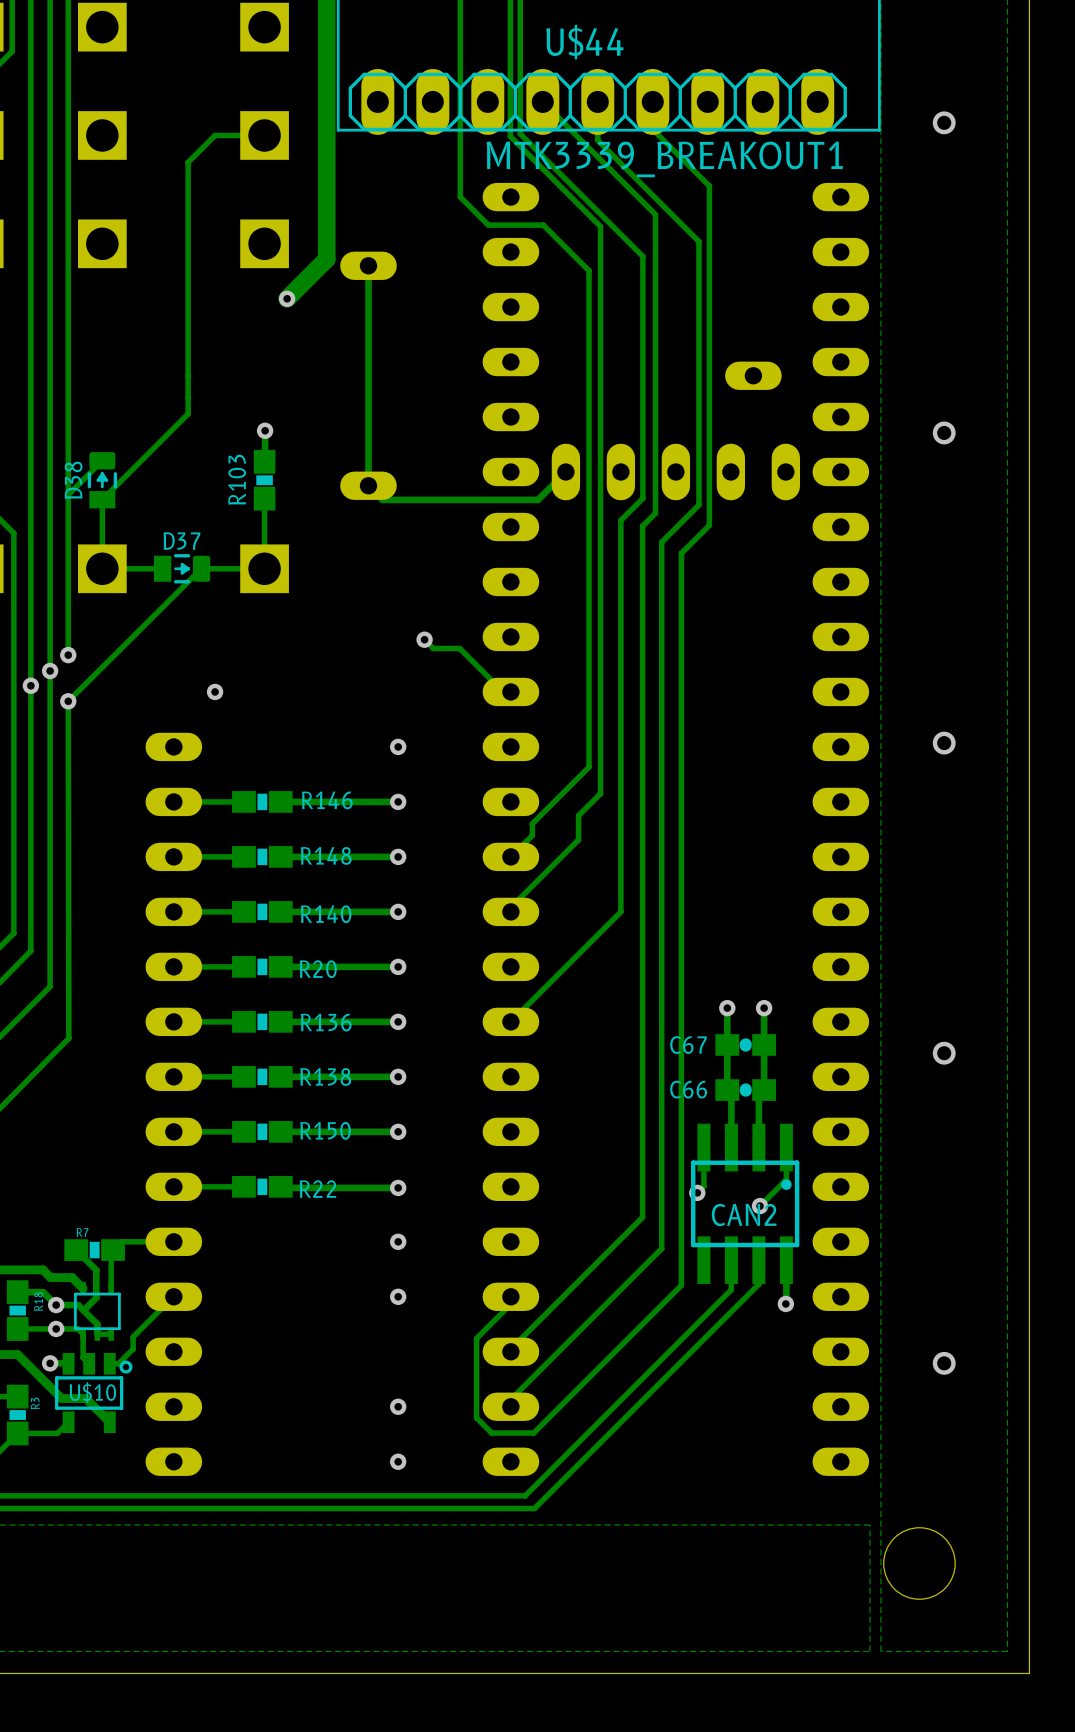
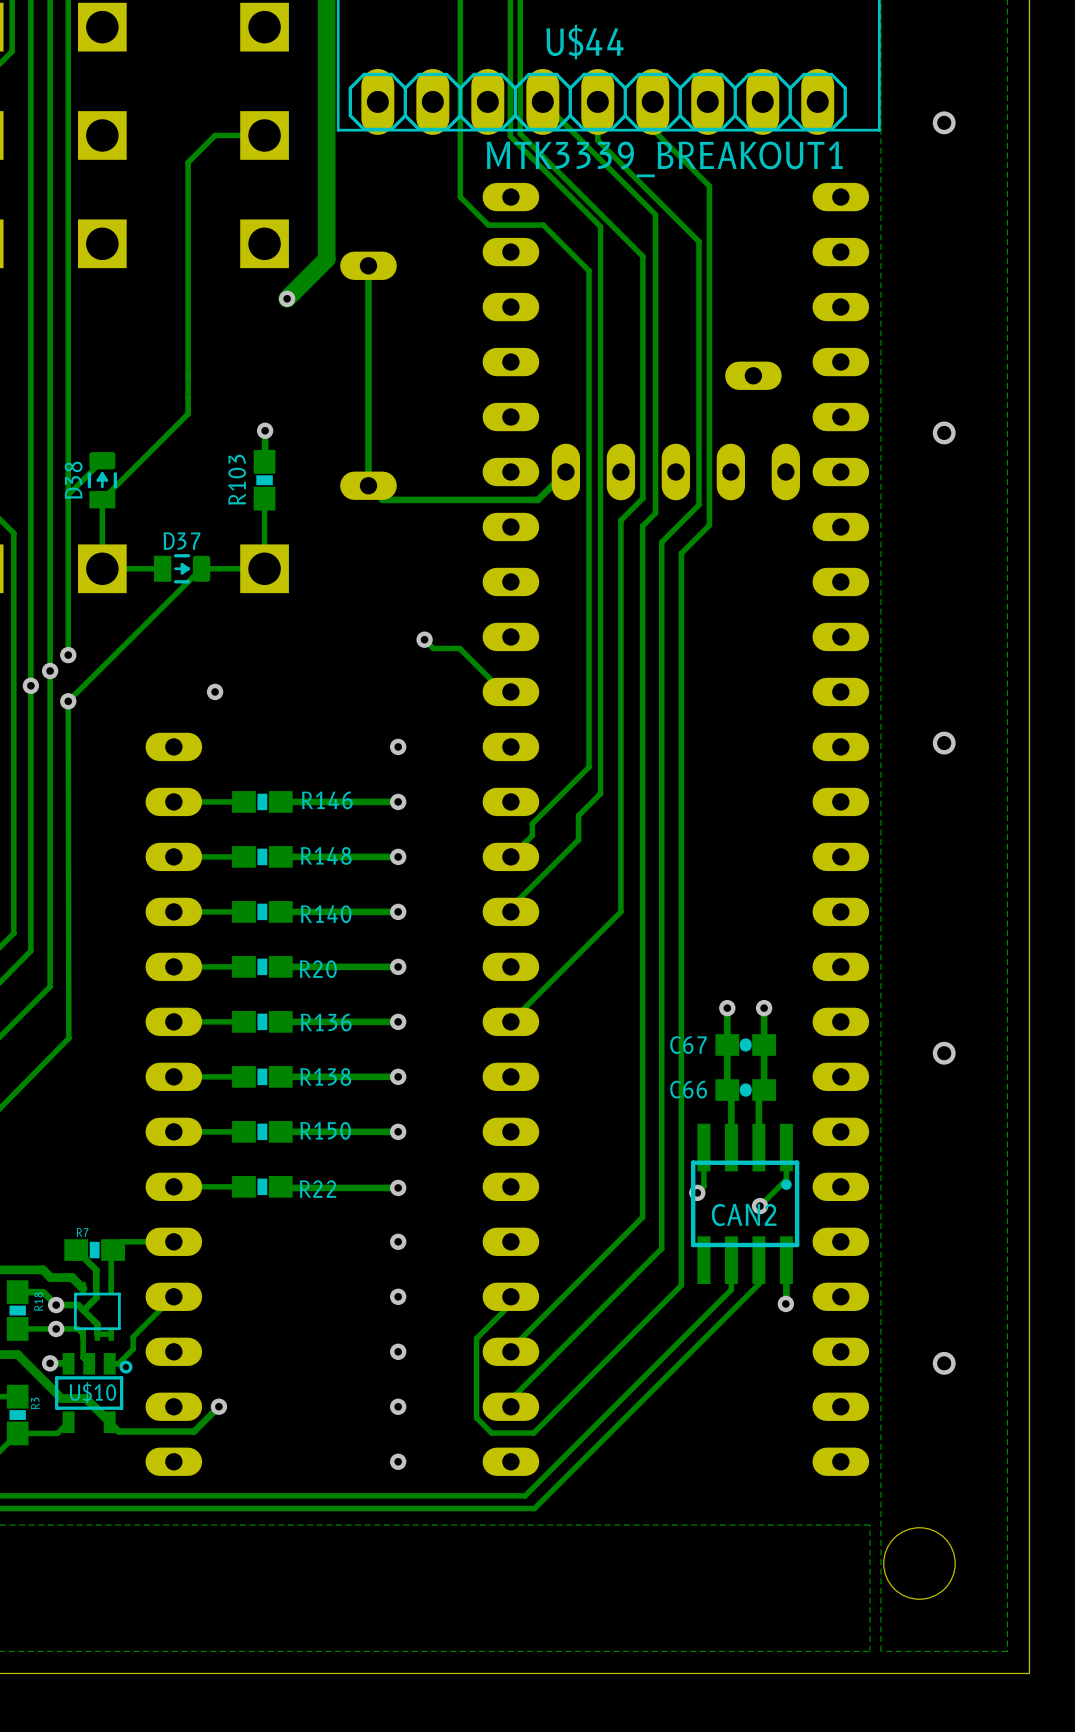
via: none -> (398, 1351)
track: none -> (218, 1406) (194, 1431) (118, 1431) (109, 1422)
via: none -> (218, 1406)

